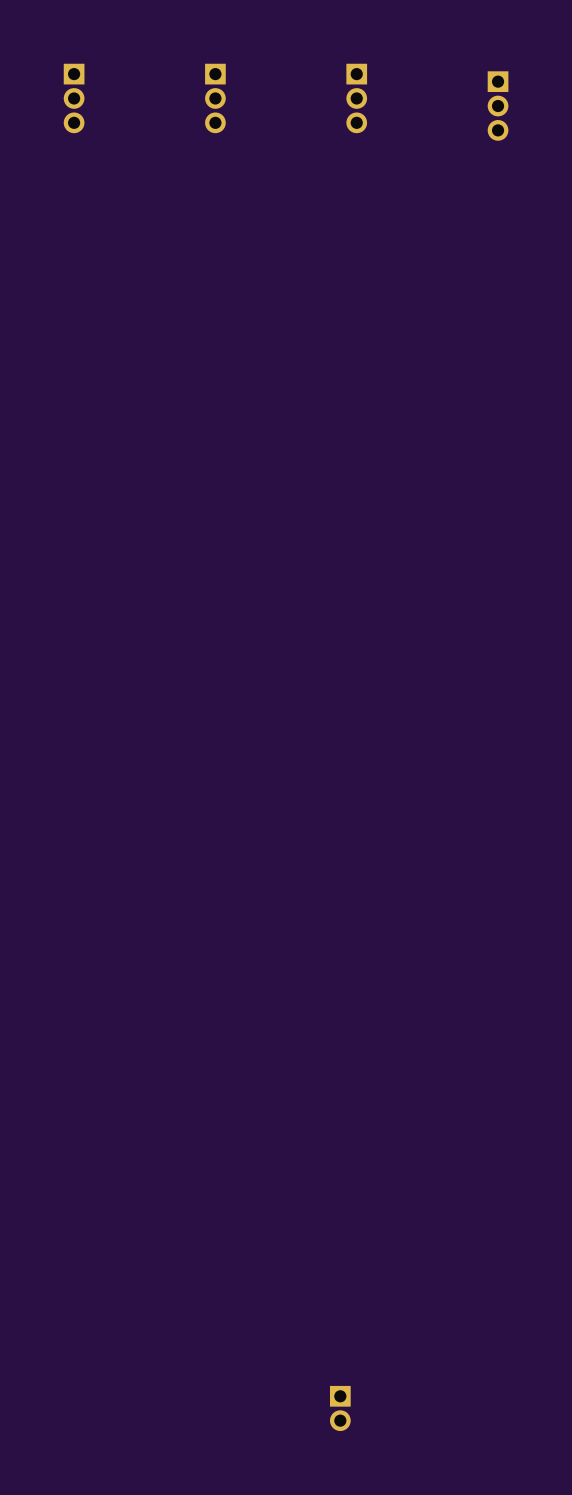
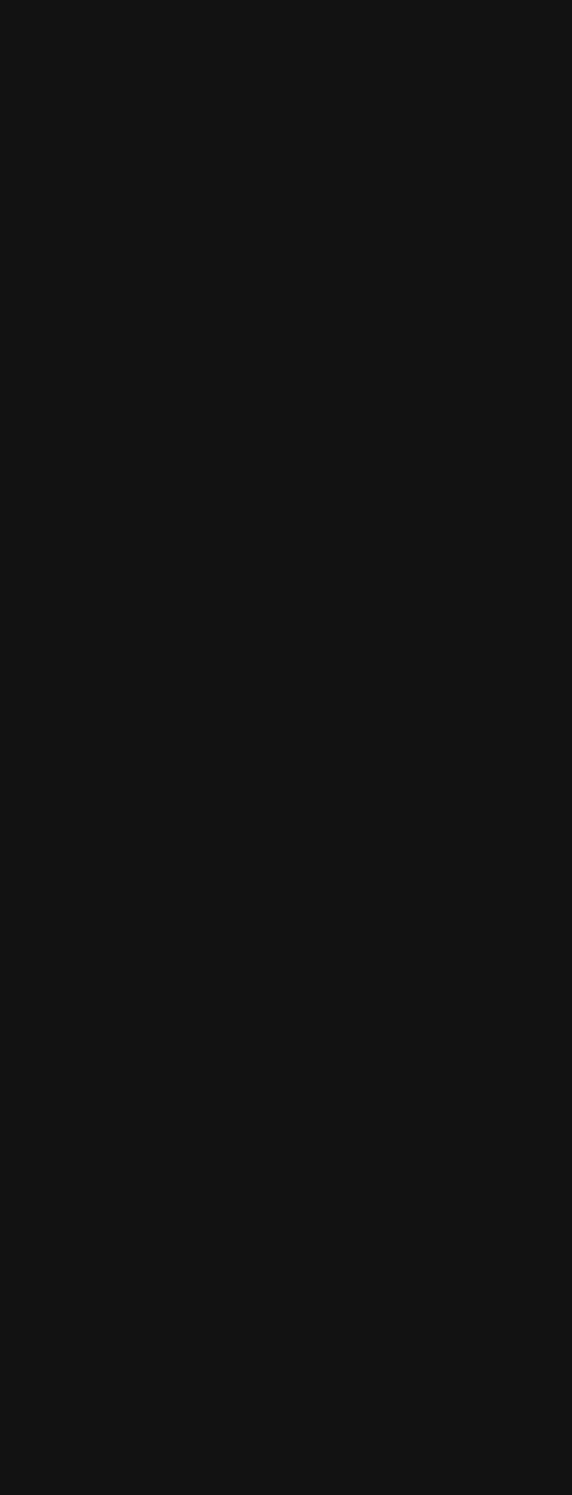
part: (74, 98) -> none
part: (215, 98) -> none
part: (356, 98) -> none
part: (498, 106) -> none
part: (340, 1408) -> none

